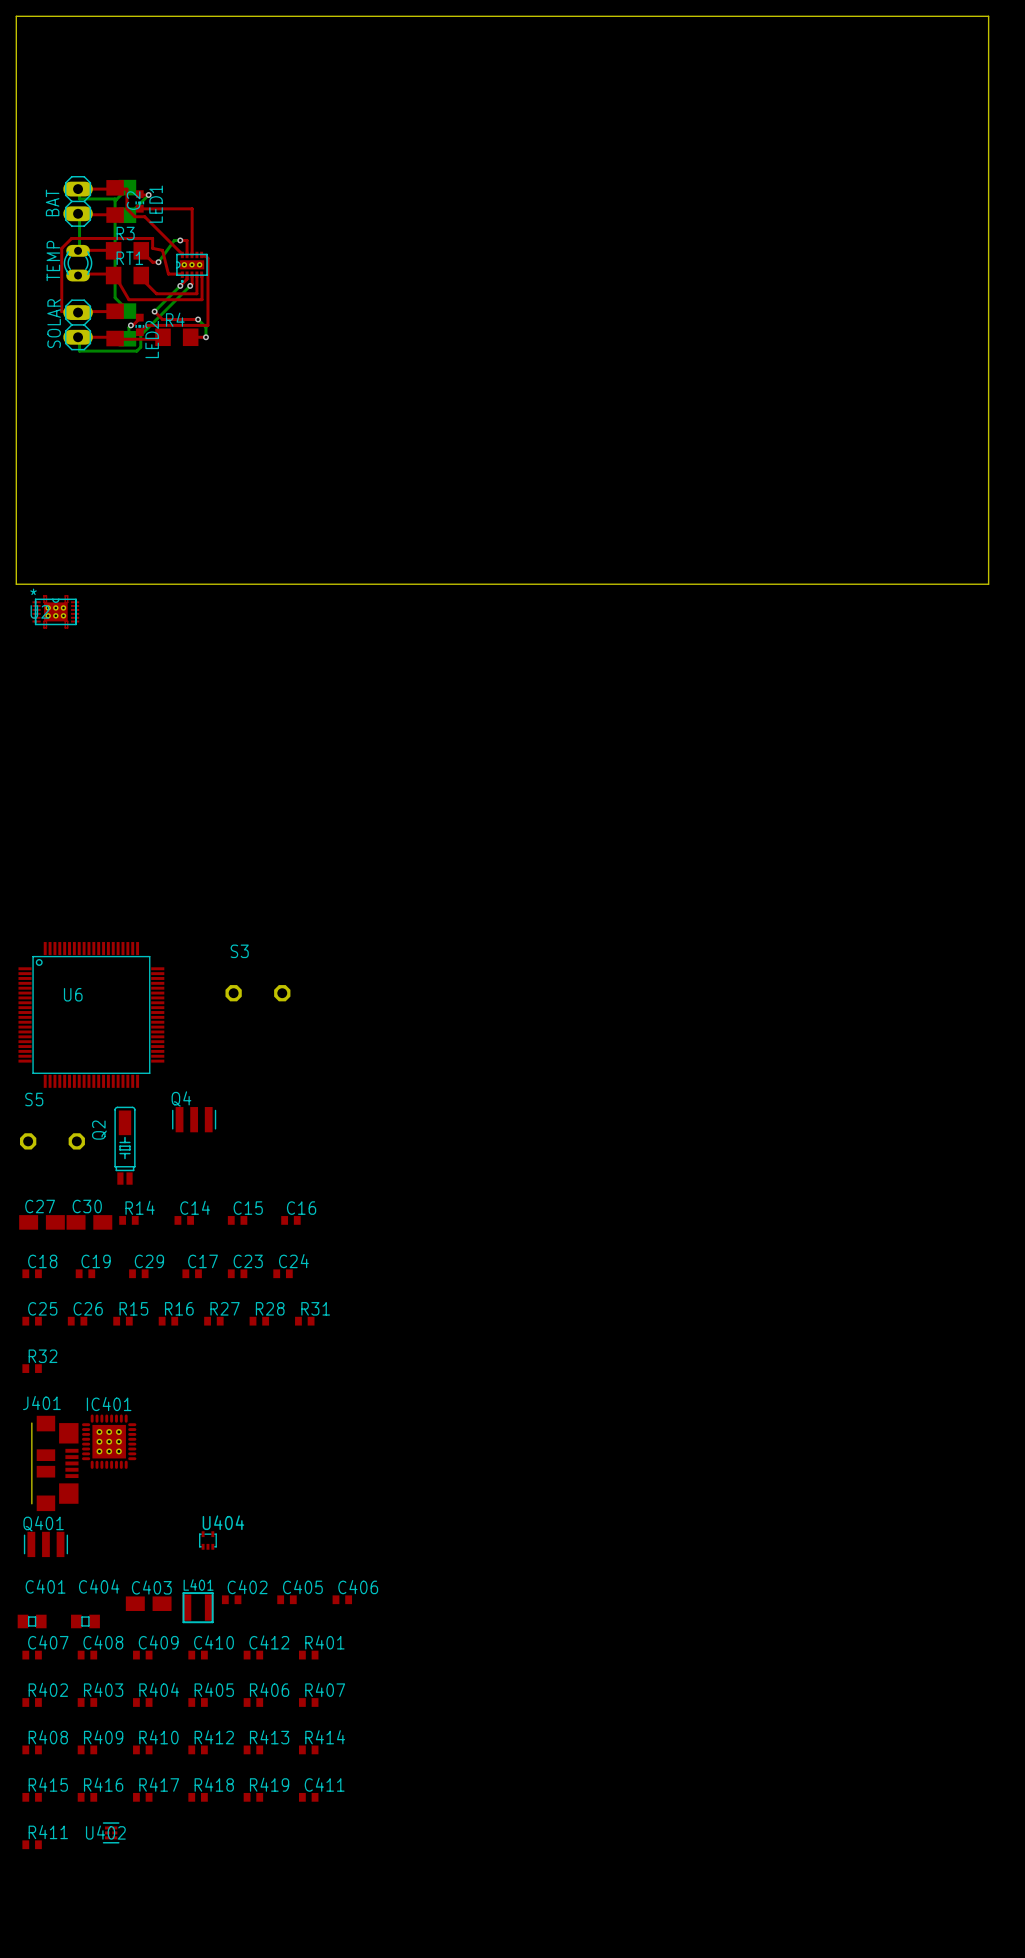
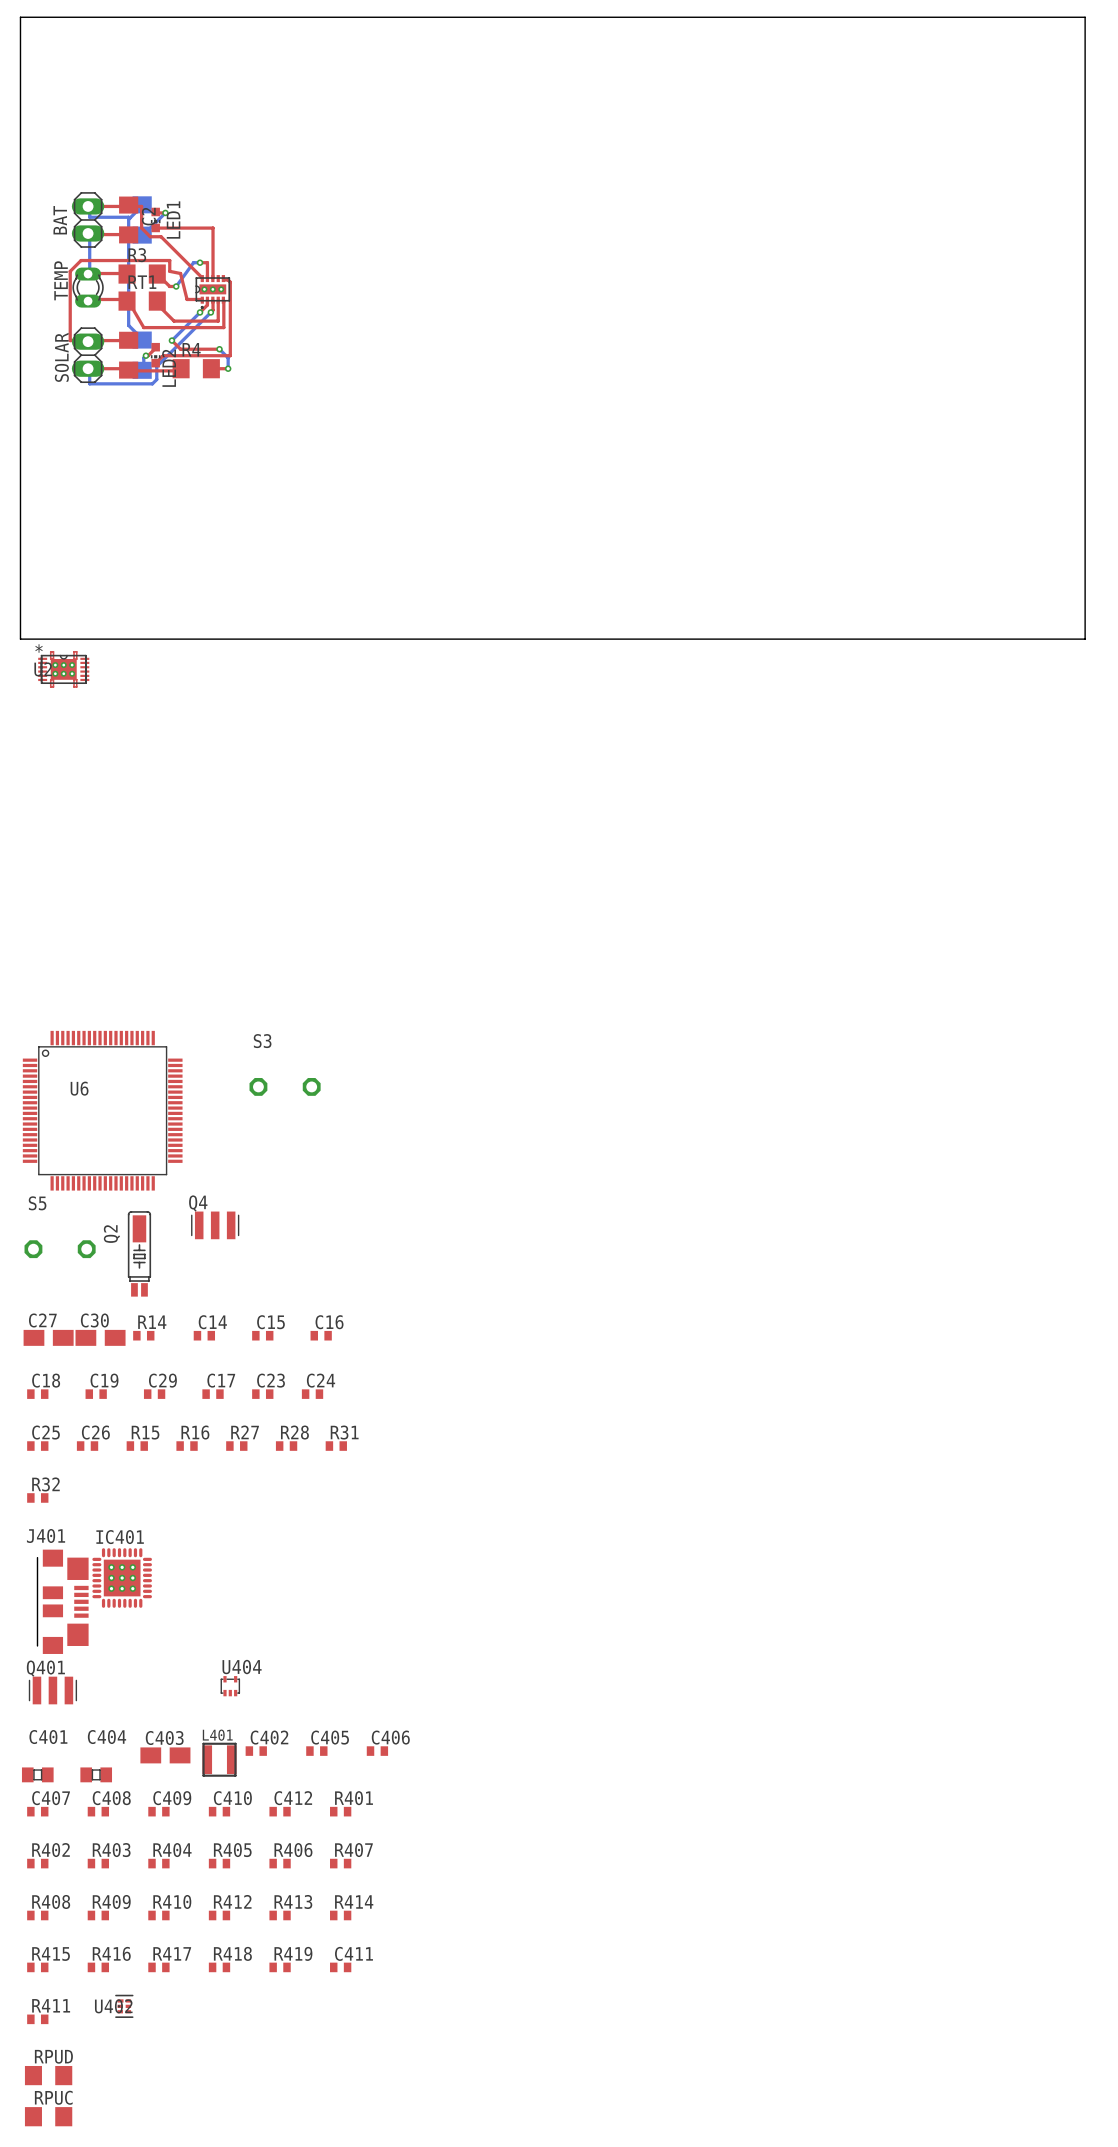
RPUD: none -> (48, 2075)
RPUC: none -> (48, 2116)

